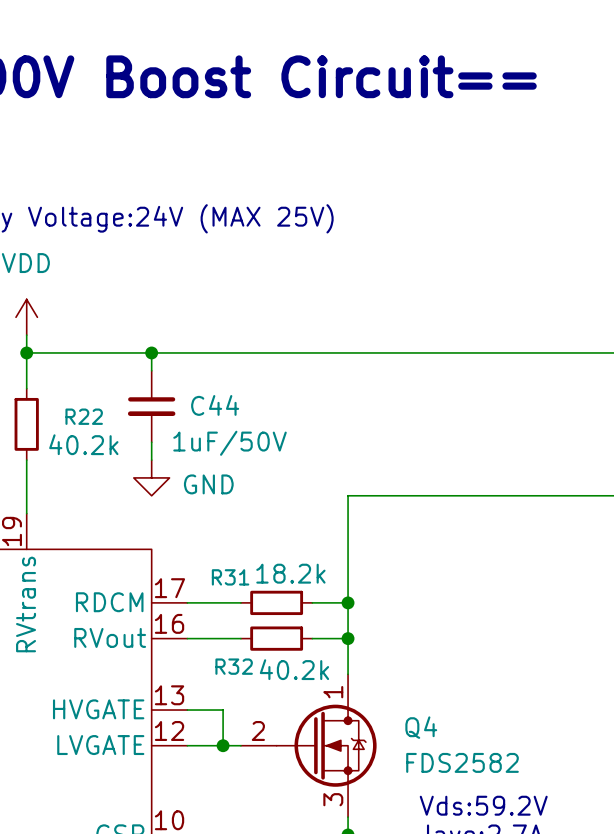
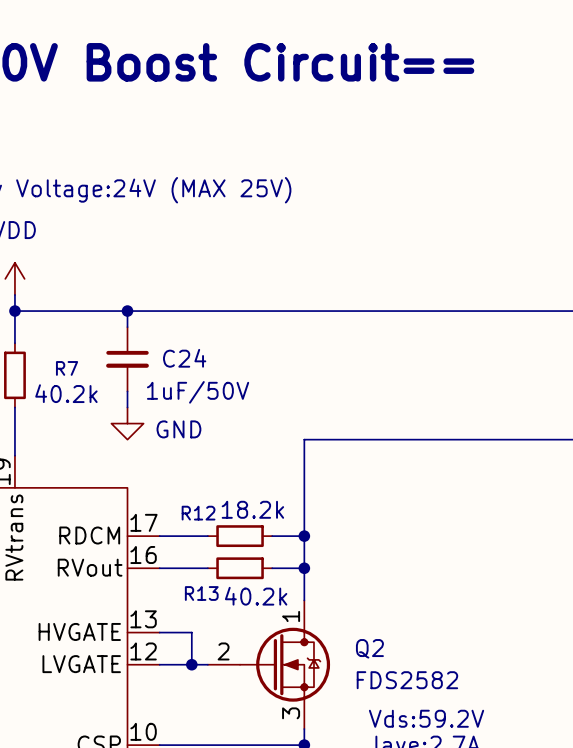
C44 name: C44 (215, 405) -> C24 (184, 358)
R22 name: R22 (84, 416) -> R7 (67, 368)
R31 name: R31 (230, 577) -> R12 (198, 513)
R32 name: R32 (234, 666) -> R13 (201, 593)
Q4 name: Q4 (421, 727) -> Q2 (369, 648)

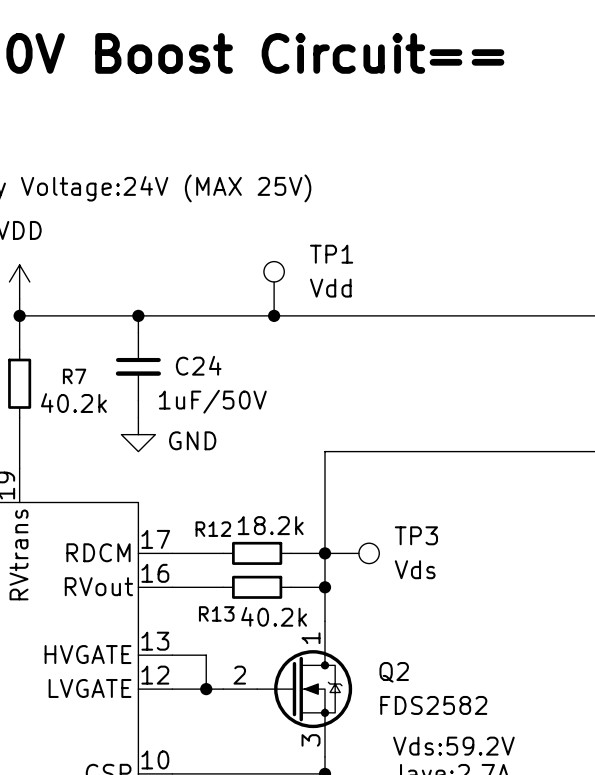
TP1: none -> Vdd (274, 288)
junction: none -> (274, 315)
TP3: none -> Vds (352, 553)

